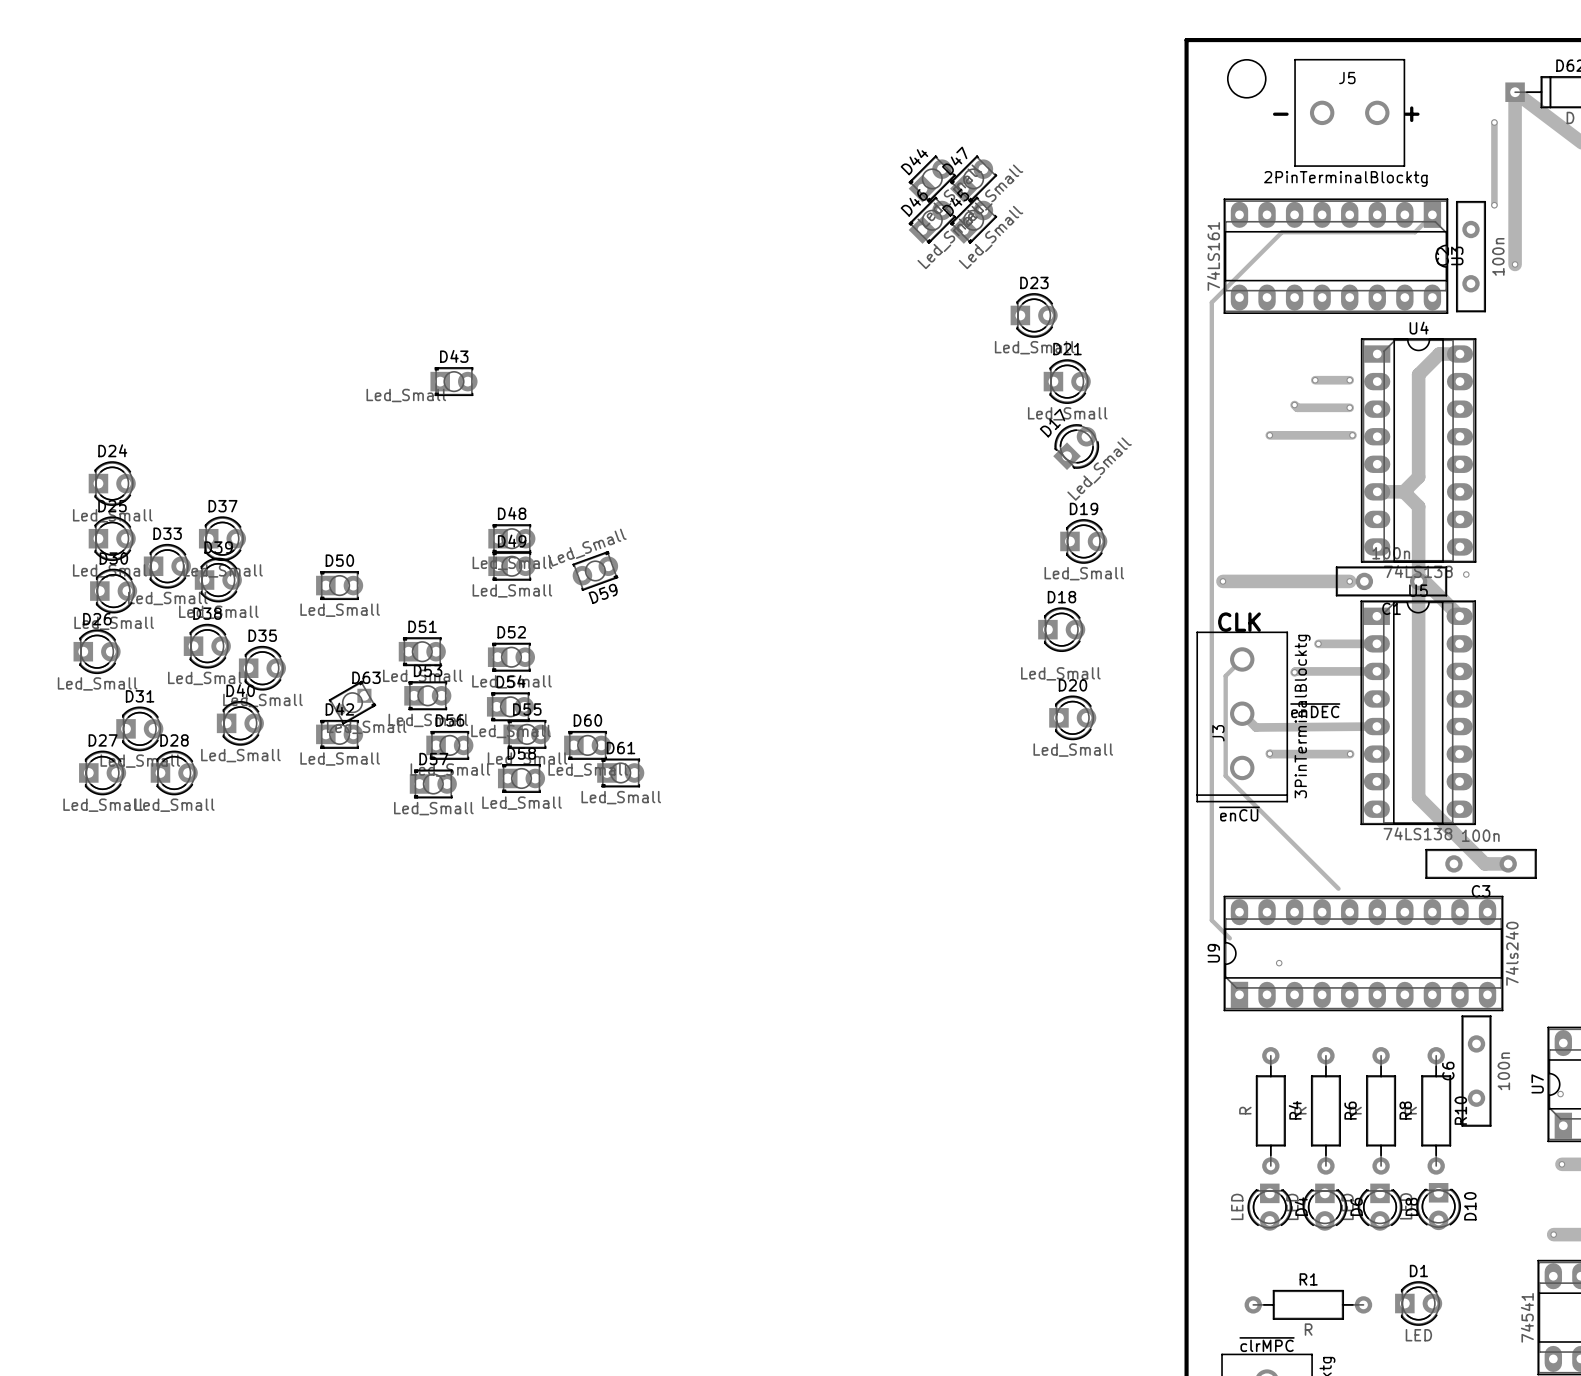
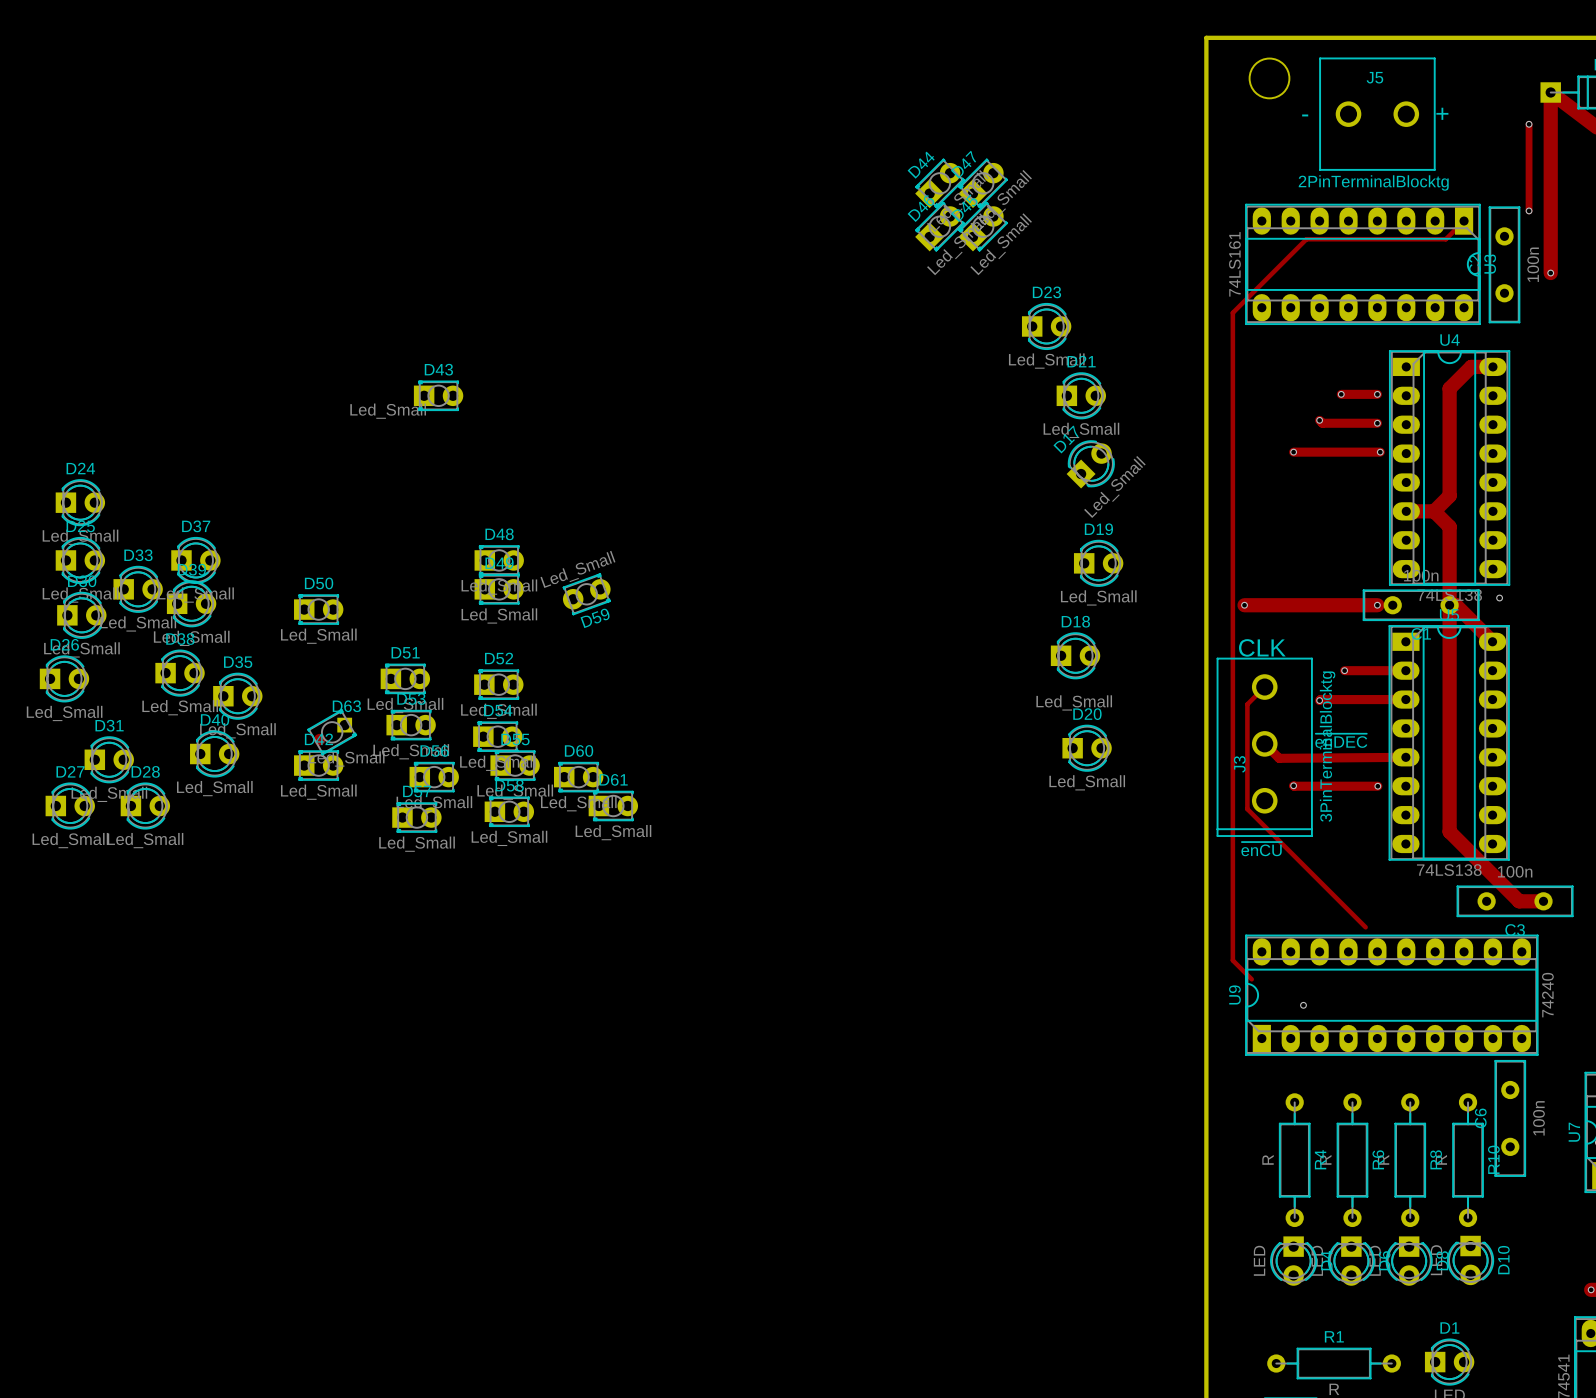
U9 value: 74ls240 (1512, 953) -> 74240 (1547, 995)

